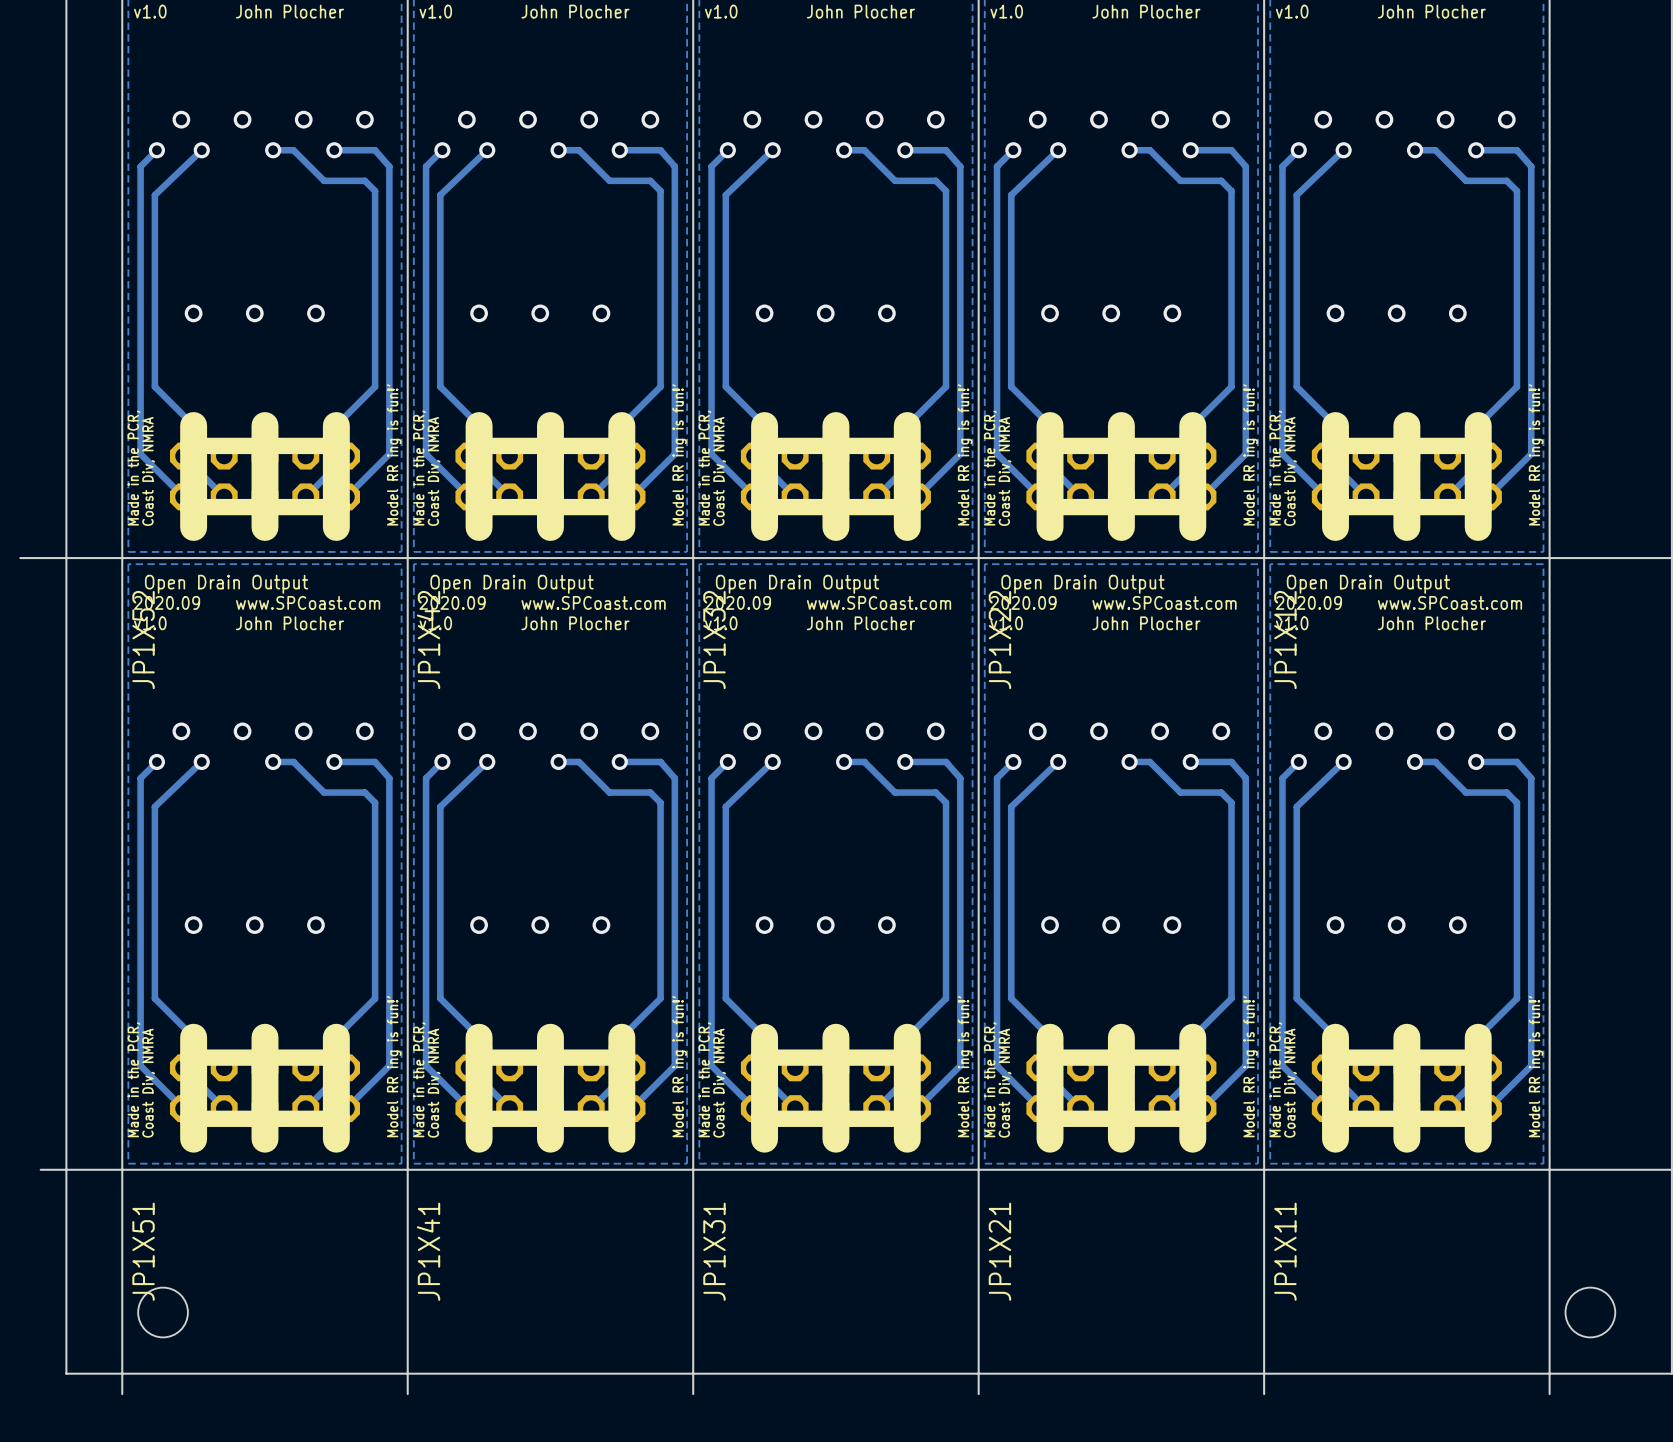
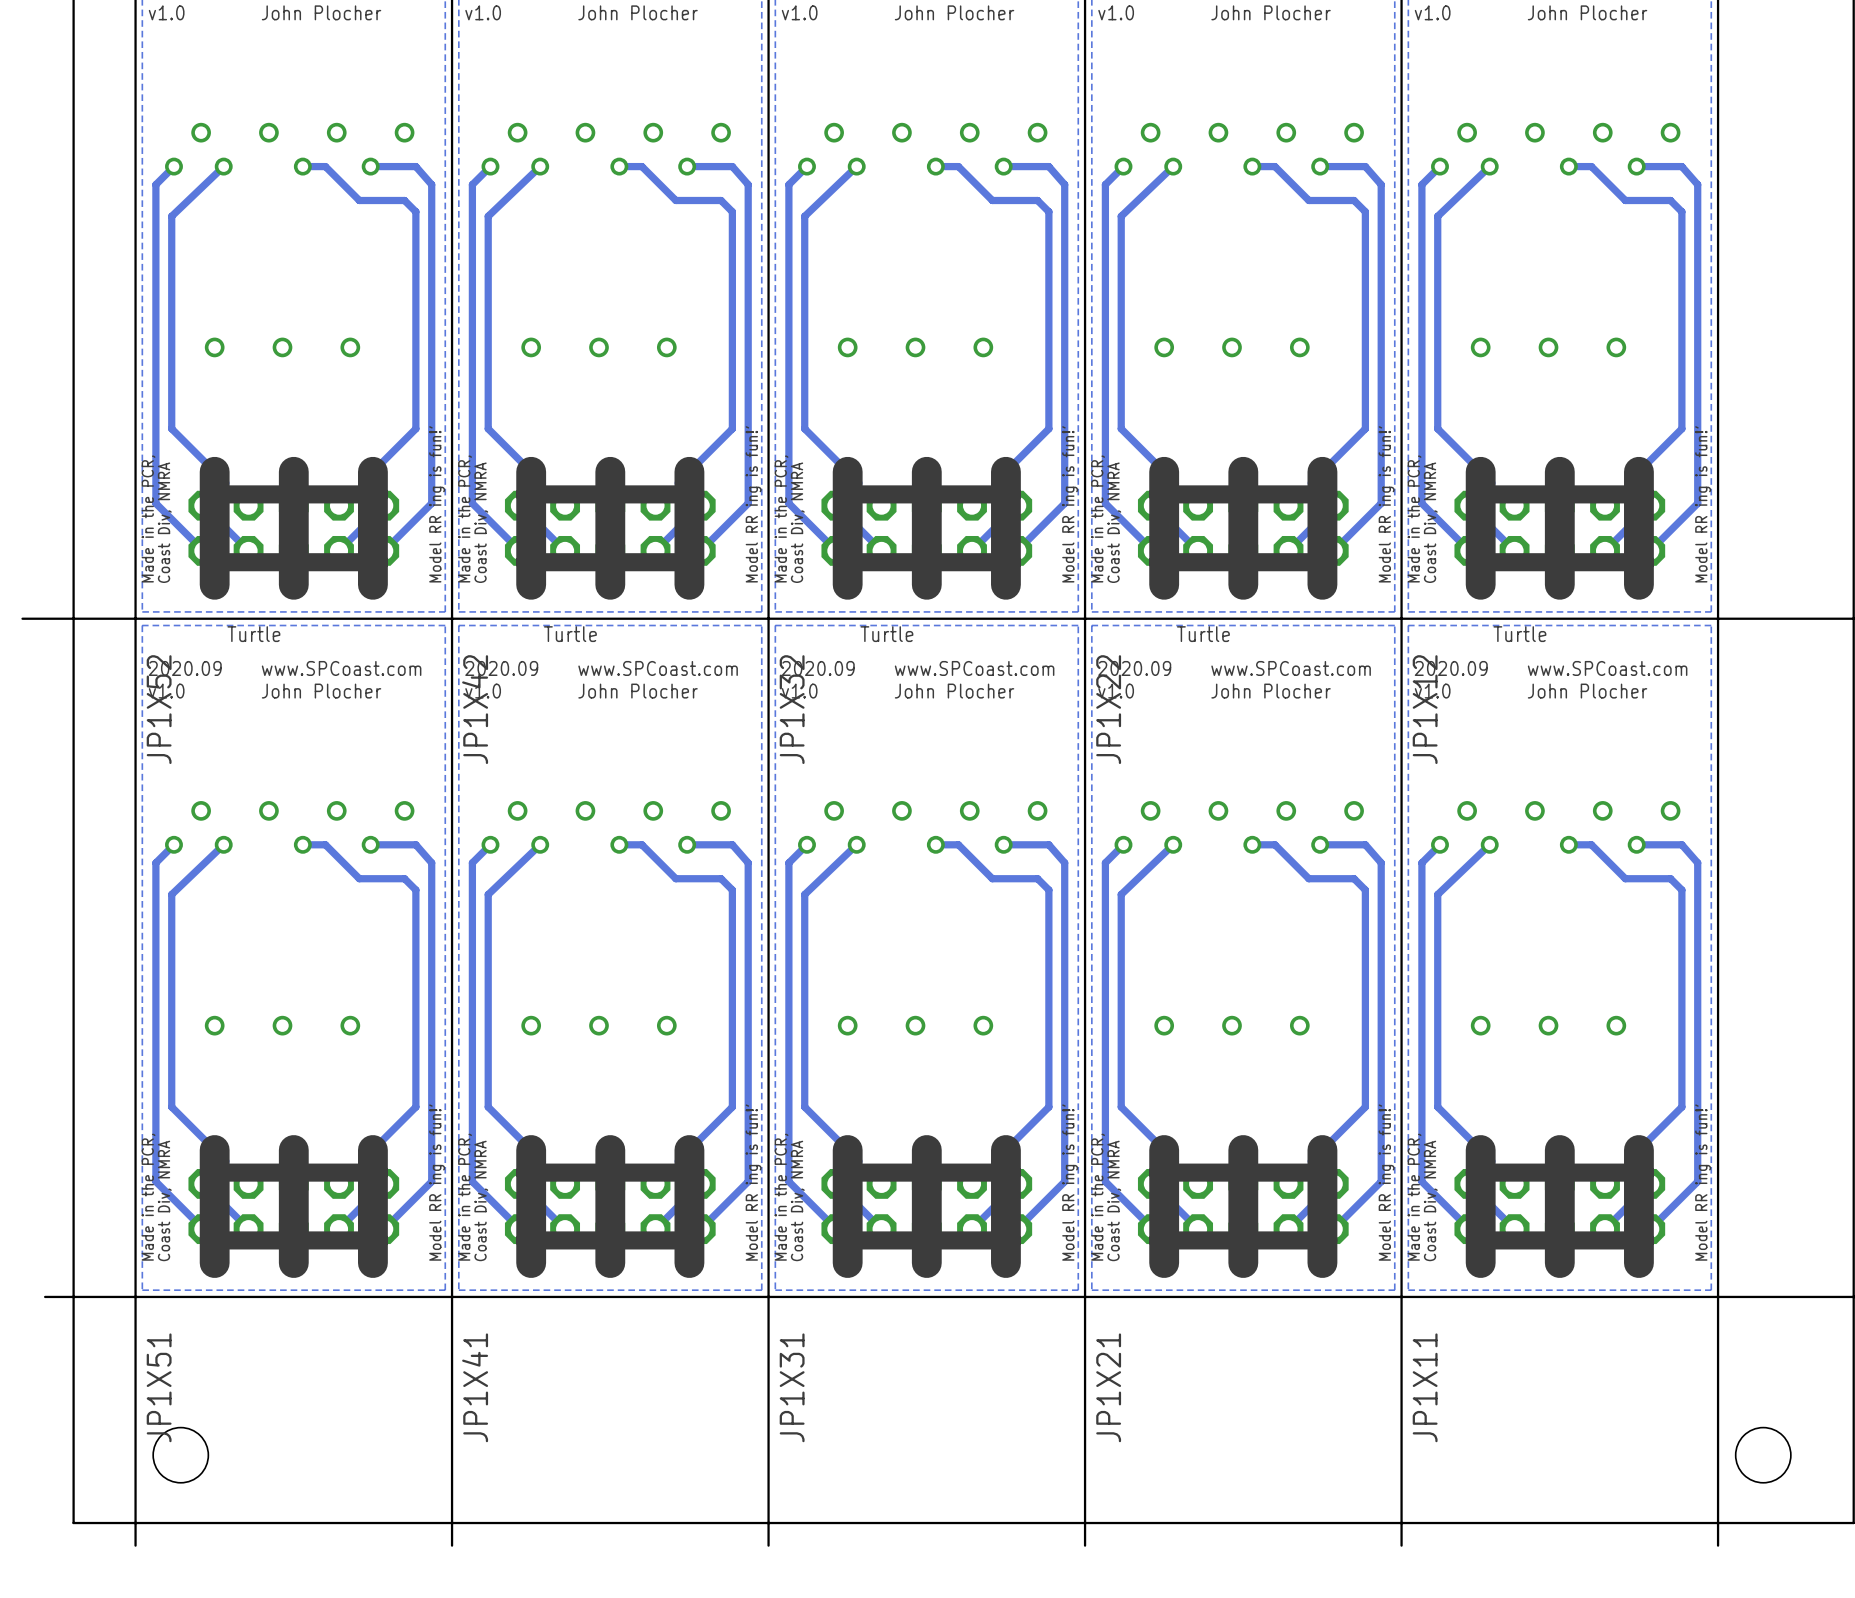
text: none -> Turtle (253, 634)
text: none -> Turtle (570, 634)
text: none -> Turtle (886, 634)
text: none -> Turtle (1203, 634)
text: none -> Turtle (1519, 634)
text: Open Drain Output (226, 584) -> none
text: Open Drain Output (512, 584) -> none
text: Open Drain Output (797, 584) -> none
text: Open Drain Output (1082, 584) -> none
text: Open Drain Output (1368, 584) -> none

